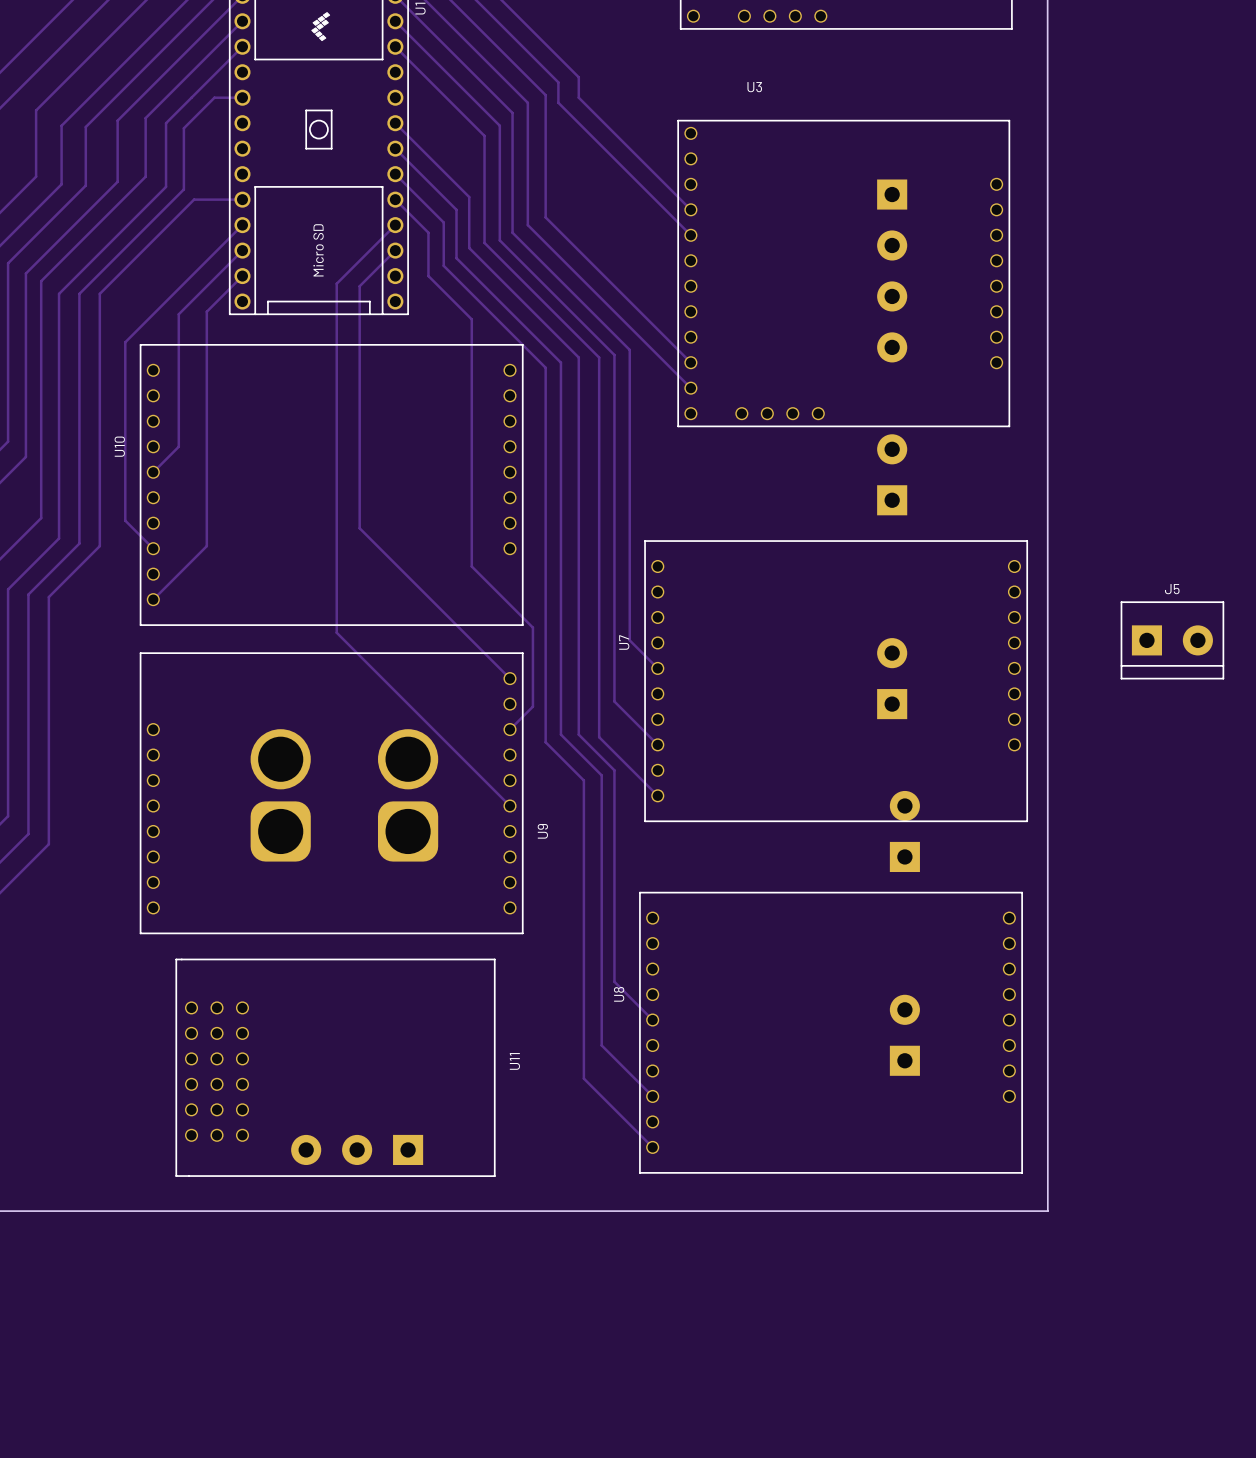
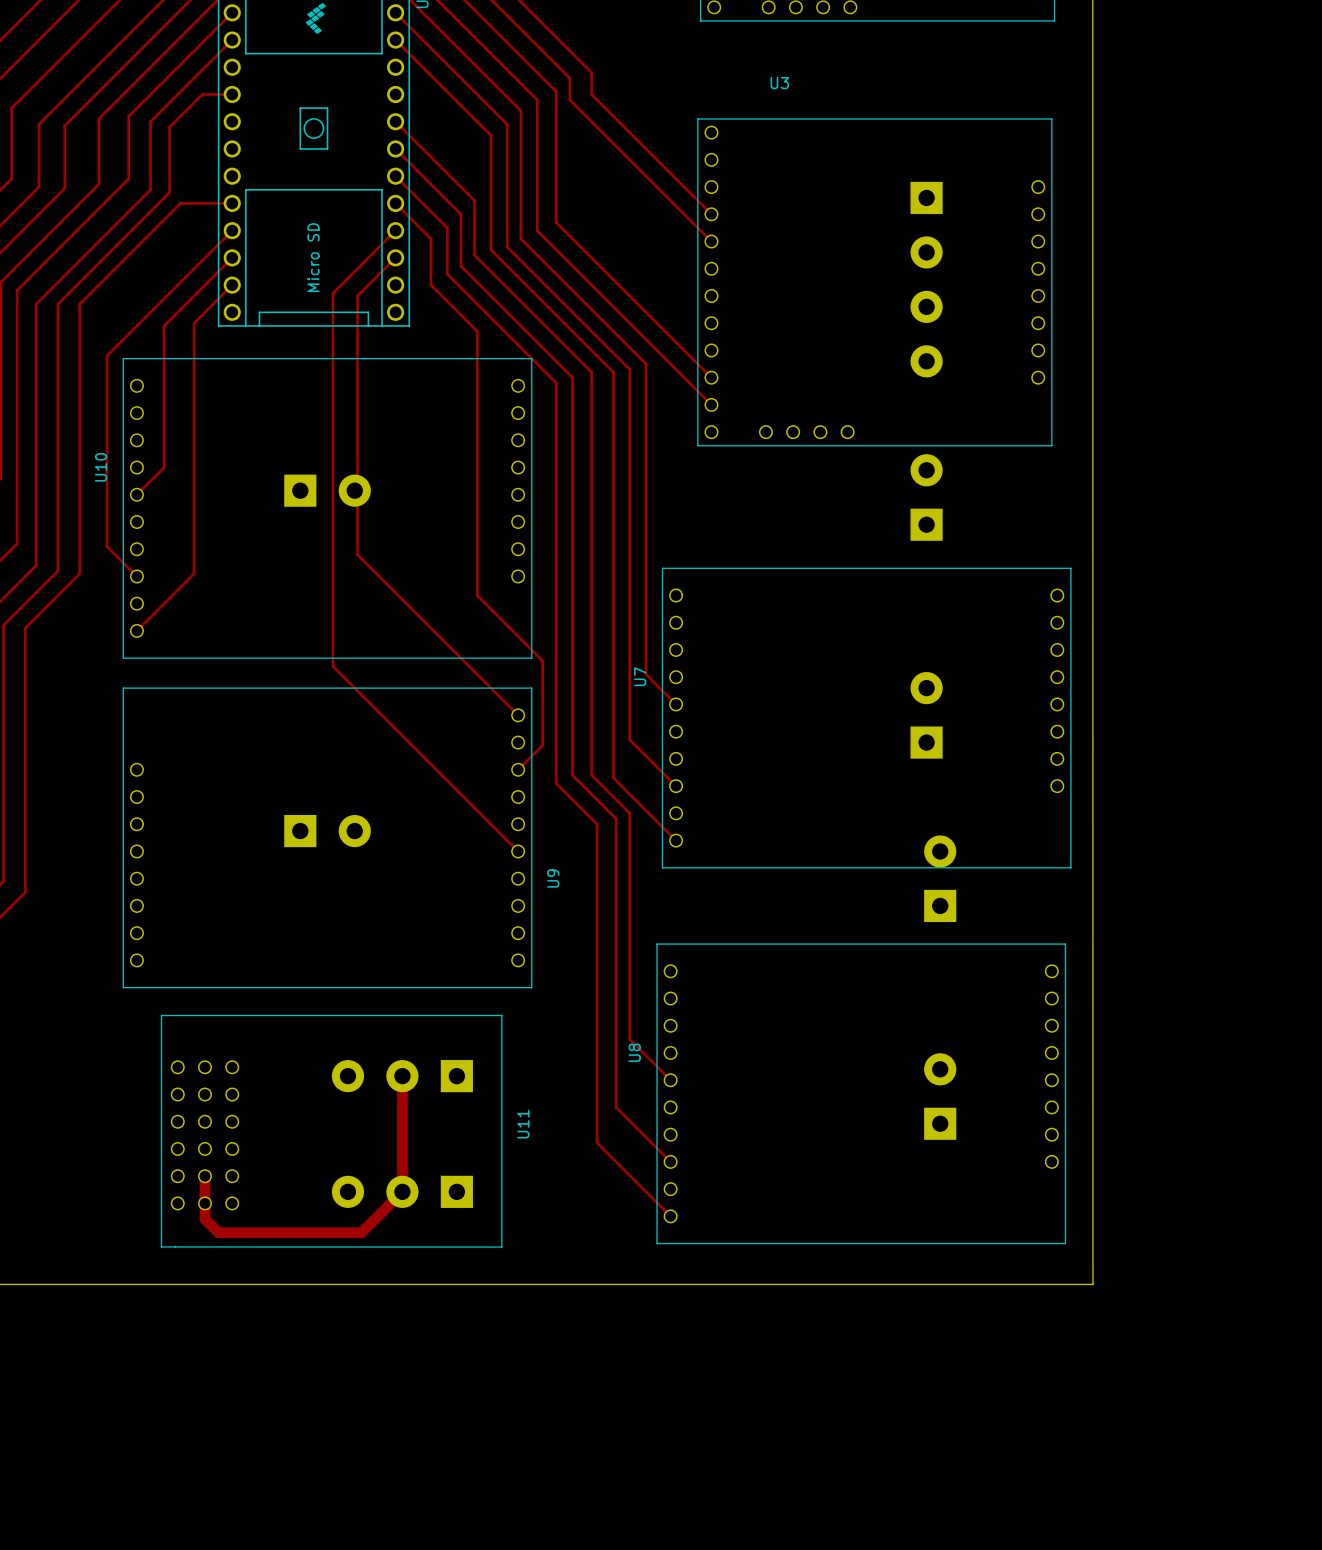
part: none -> (327, 490)
J5: (1172, 640) -> none
part: none -> (327, 831)
part: (280, 795) -> none
part: (408, 795) -> none
track: none -> (402, 1076) (402, 1191) (361, 1232) (218, 1232) (205, 1219) (205, 1176)
part: none -> (402, 1076)
part position: (357, 1149) -> (402, 1191)

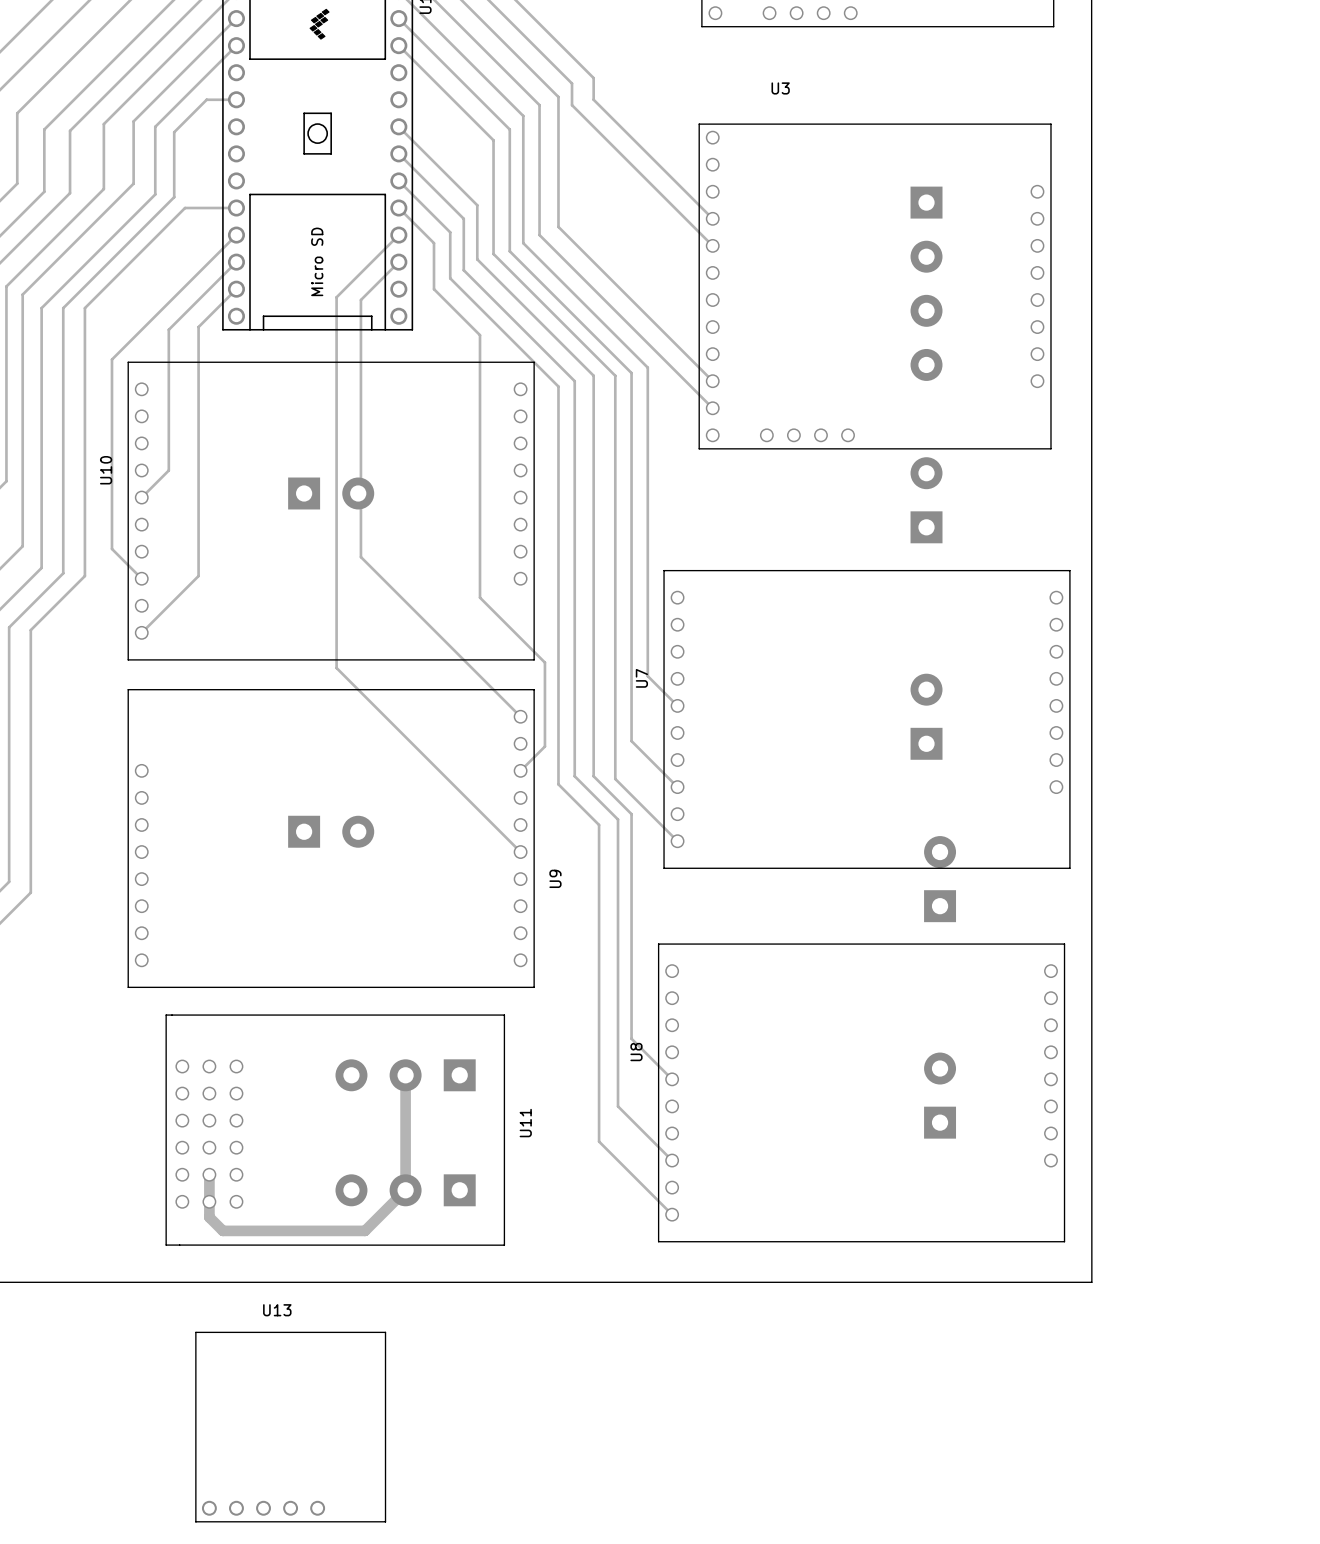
U13: none -> (290, 1427)

